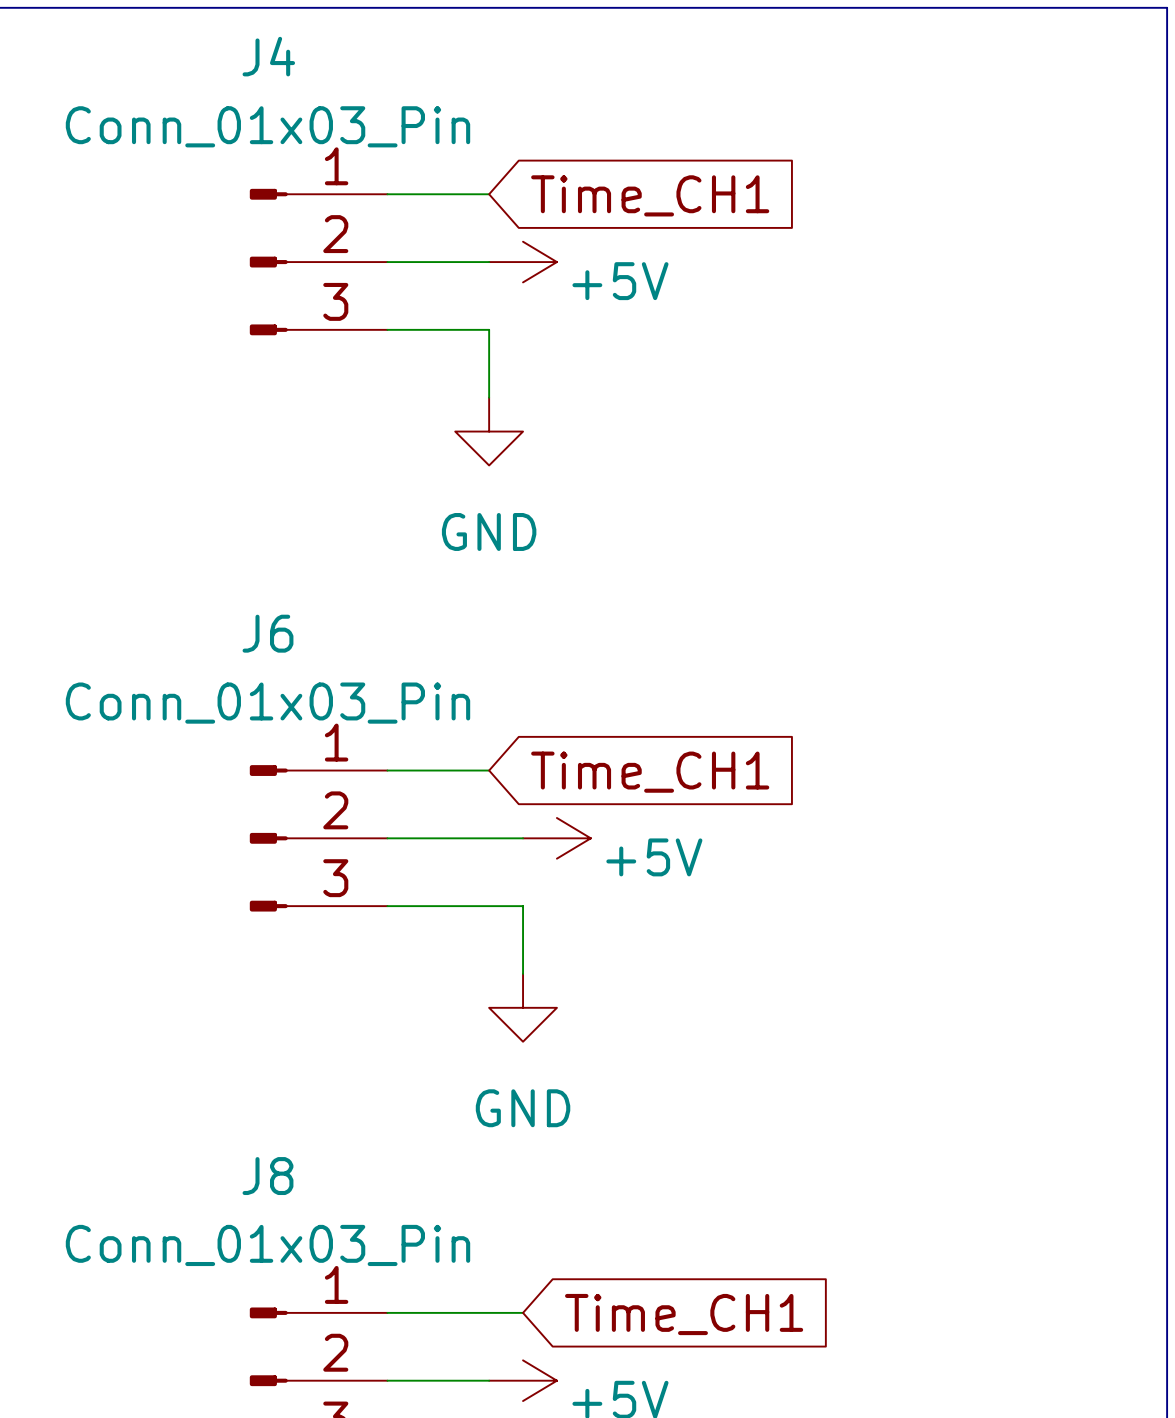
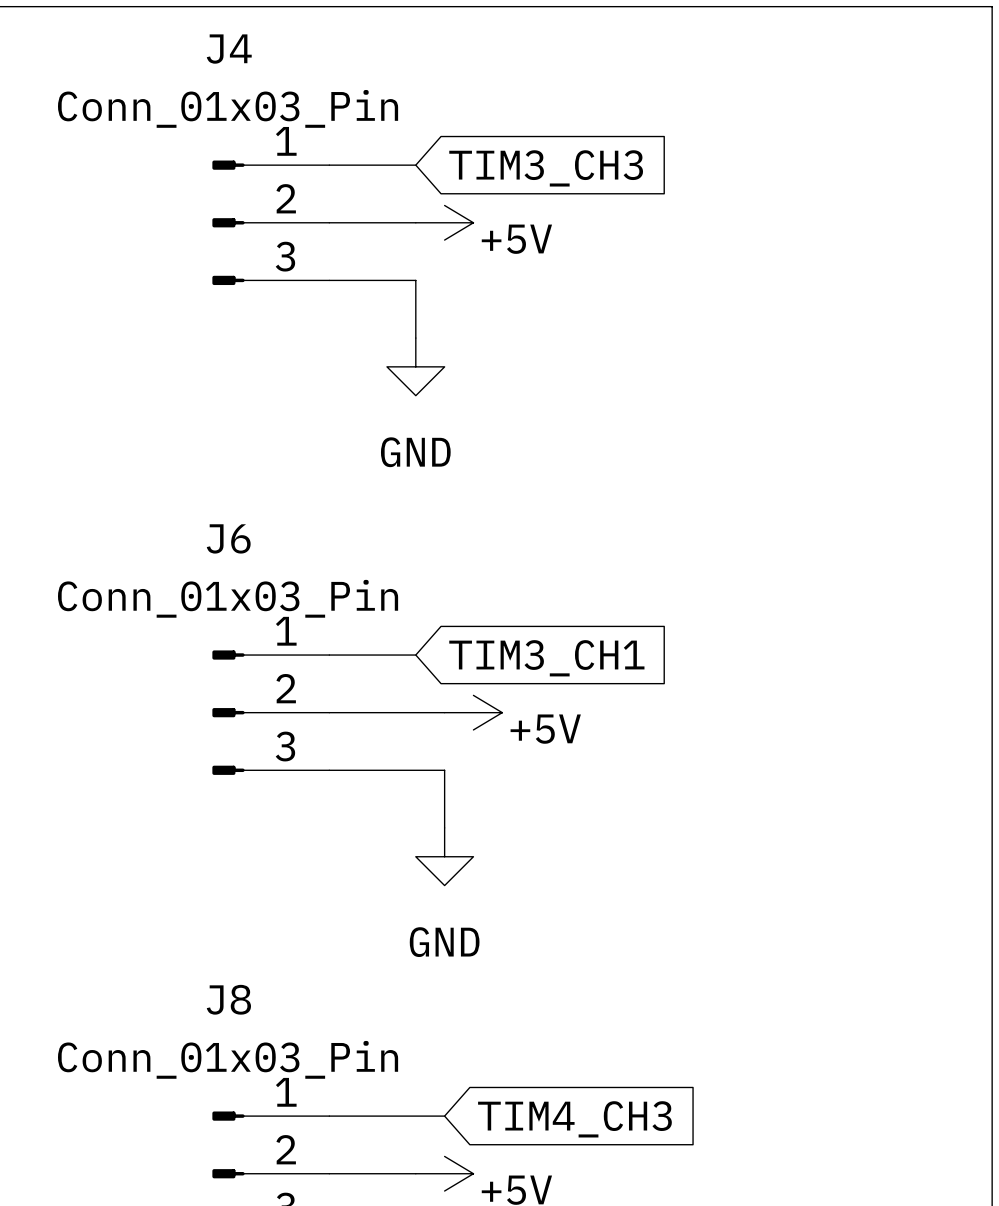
global label: Time_CH1 (650, 195) -> TIM3_CH3 (546, 168)
global label: Time_CH1 (650, 772) -> TIM3_CH1 (546, 658)
global label: Time_CH1 (684, 1314) -> TIM4_CH3 (574, 1119)

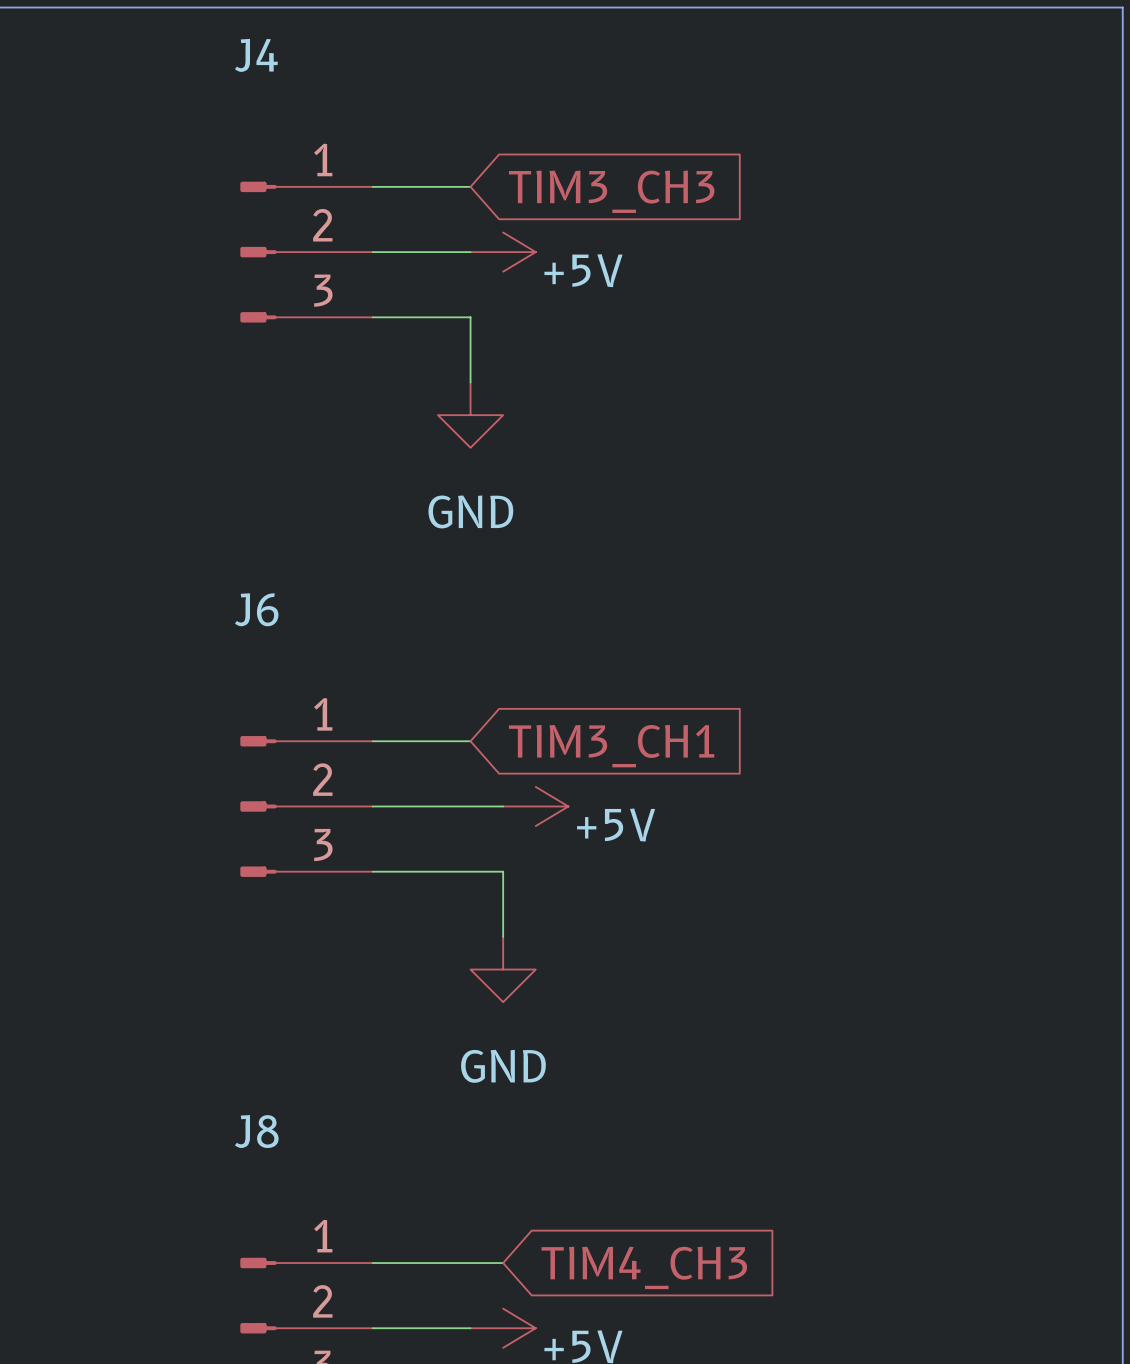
J4 value: Conn_01x03_Pin (228, 108) -> none
J6 value: Conn_01x03_Pin (228, 598) -> none
J8 value: Conn_01x03_Pin (228, 1059) -> none

